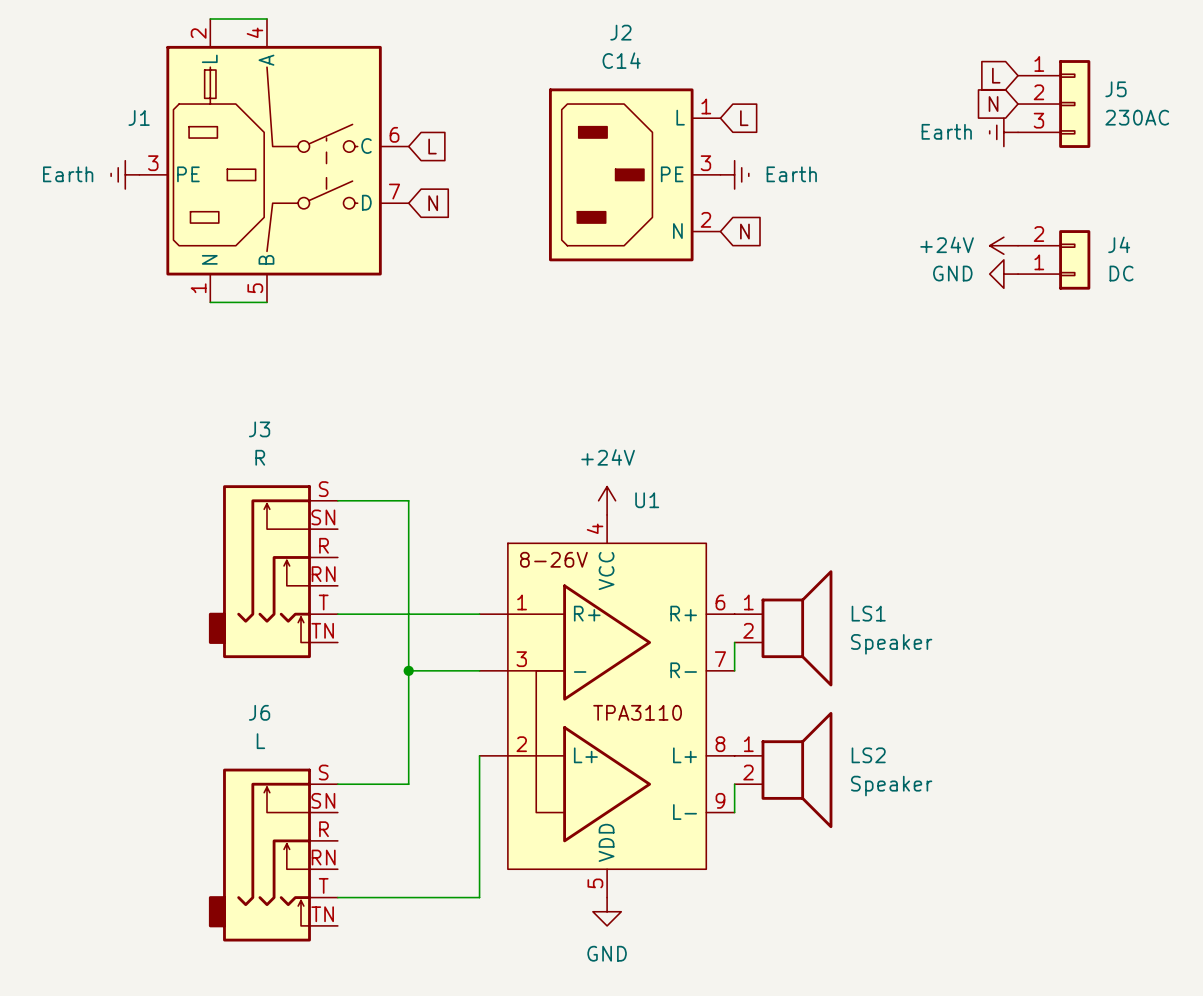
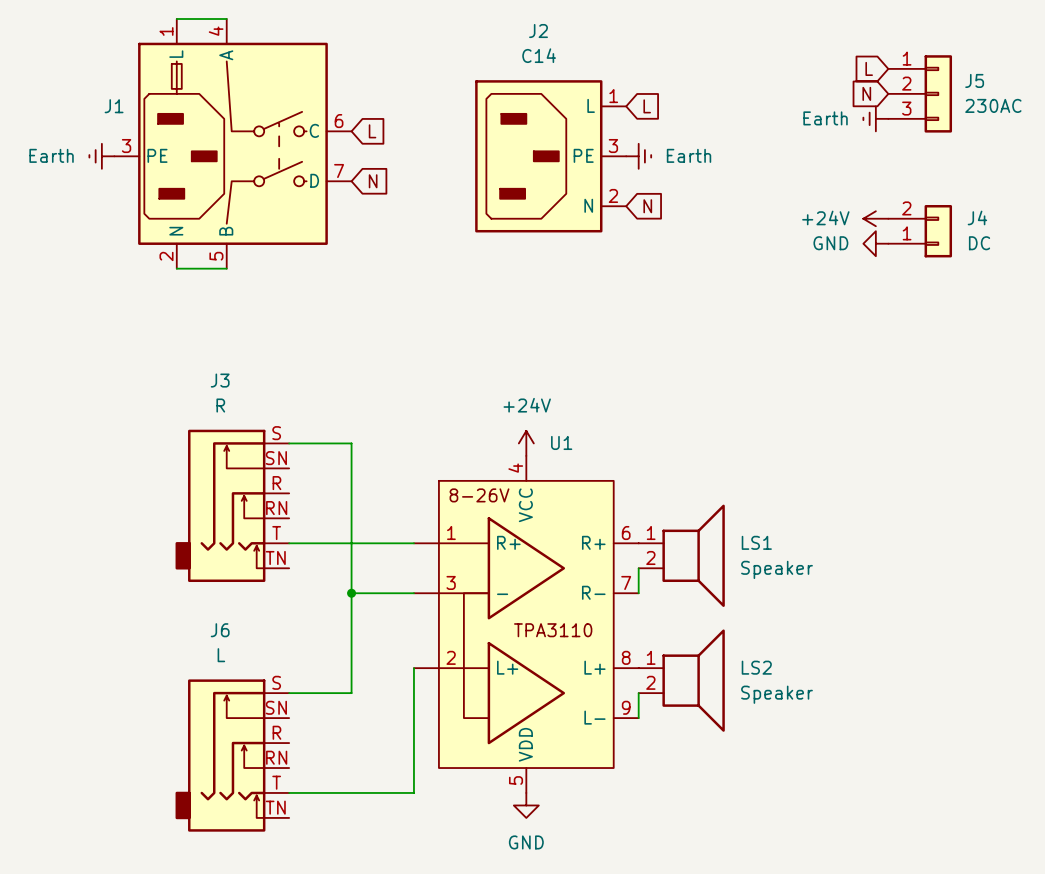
J1 symbol: [139, 18, 409, 303] -> [114, 19, 352, 269]

